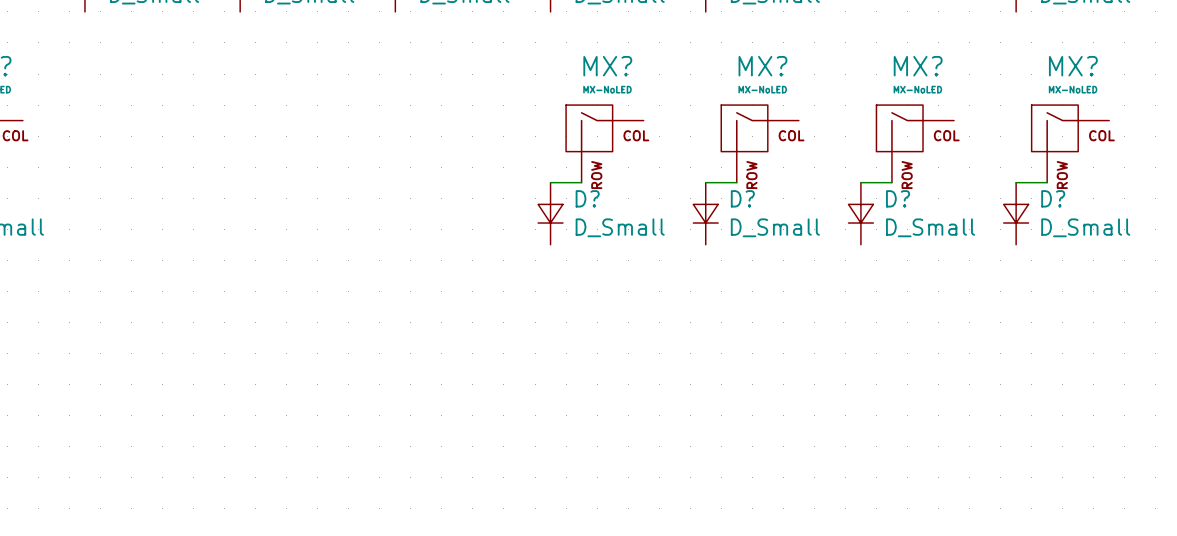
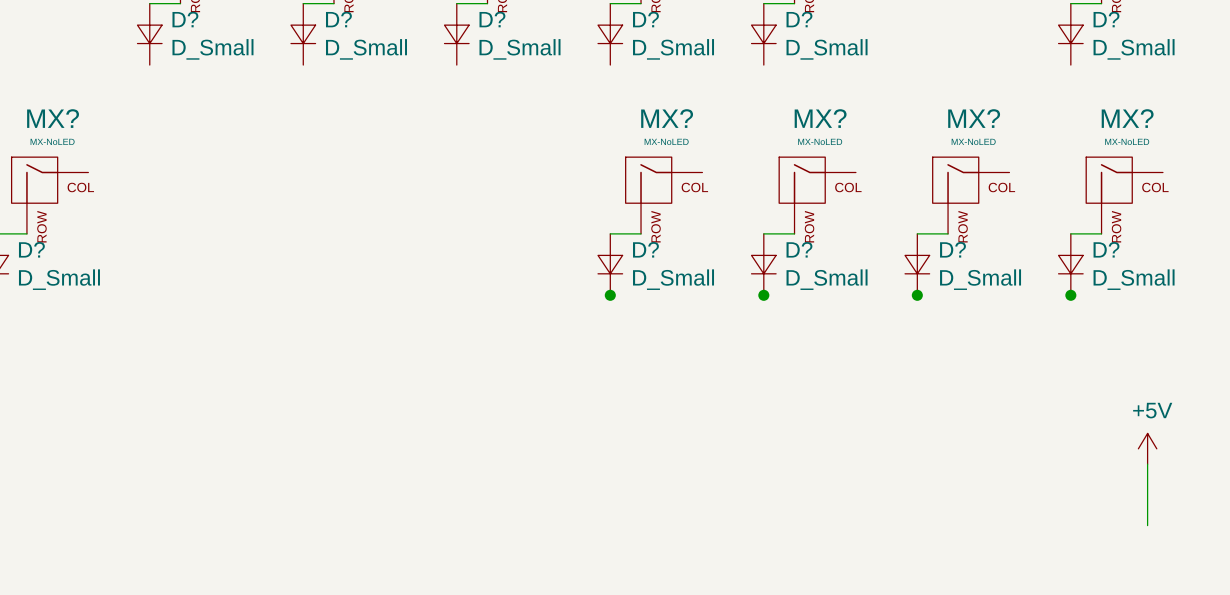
junction: none -> (610, 295)
junction: none -> (763, 295)
junction: none -> (917, 295)
junction: none -> (1070, 295)
power symbol: none -> +5V (1147, 448)
wire: none -> (1147, 464) (1147, 525)

